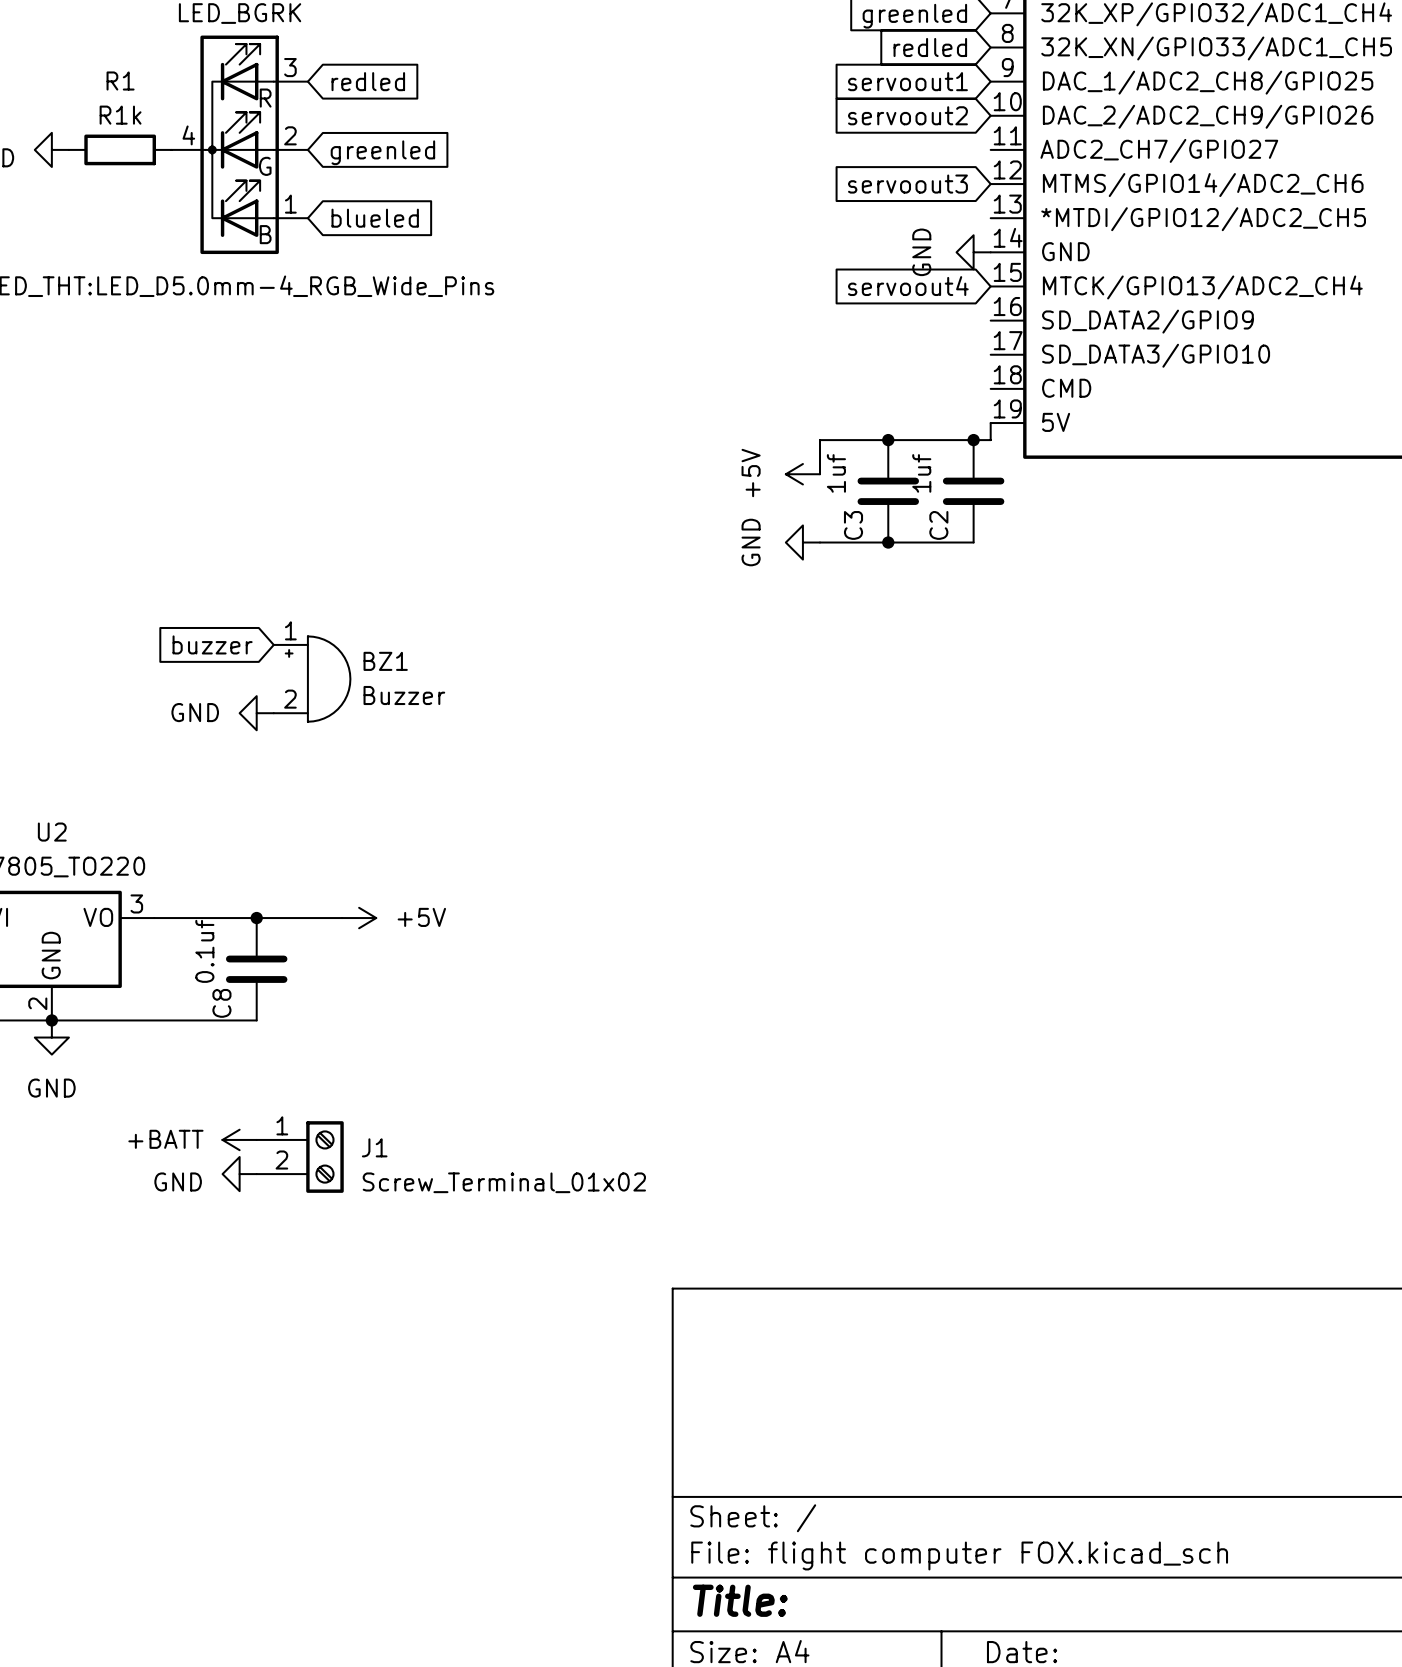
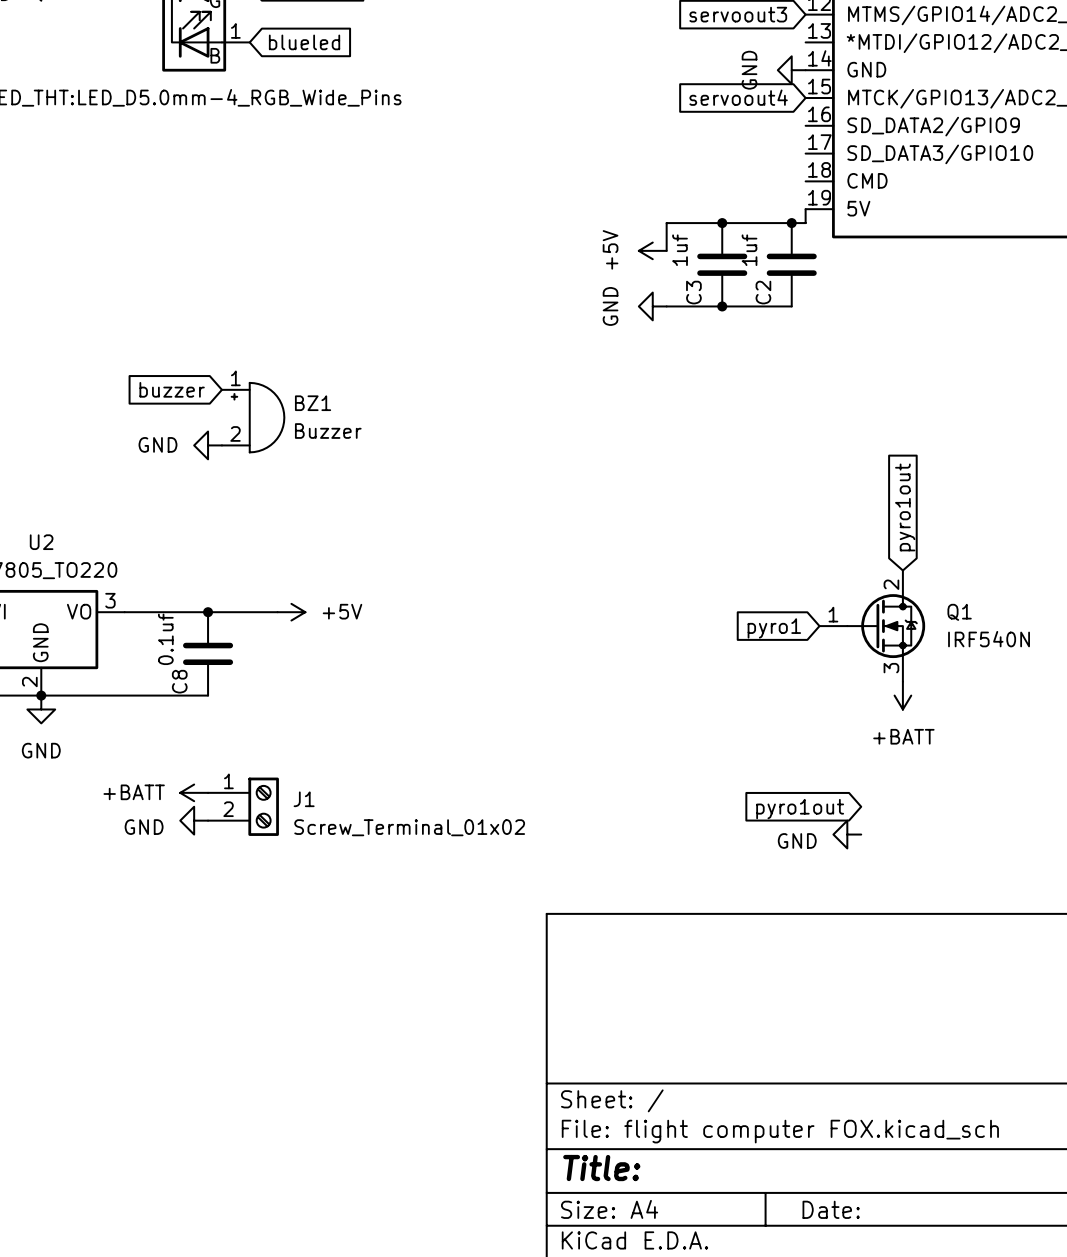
global label: none -> pyro1out (905, 507)
Q1: none -> IRF540N (872, 626)
global label: none -> pyro1 (774, 628)
power symbol: none -> +BATT (902, 695)
global label: none -> pyro1out (800, 809)
power symbol: none -> GND (847, 834)

